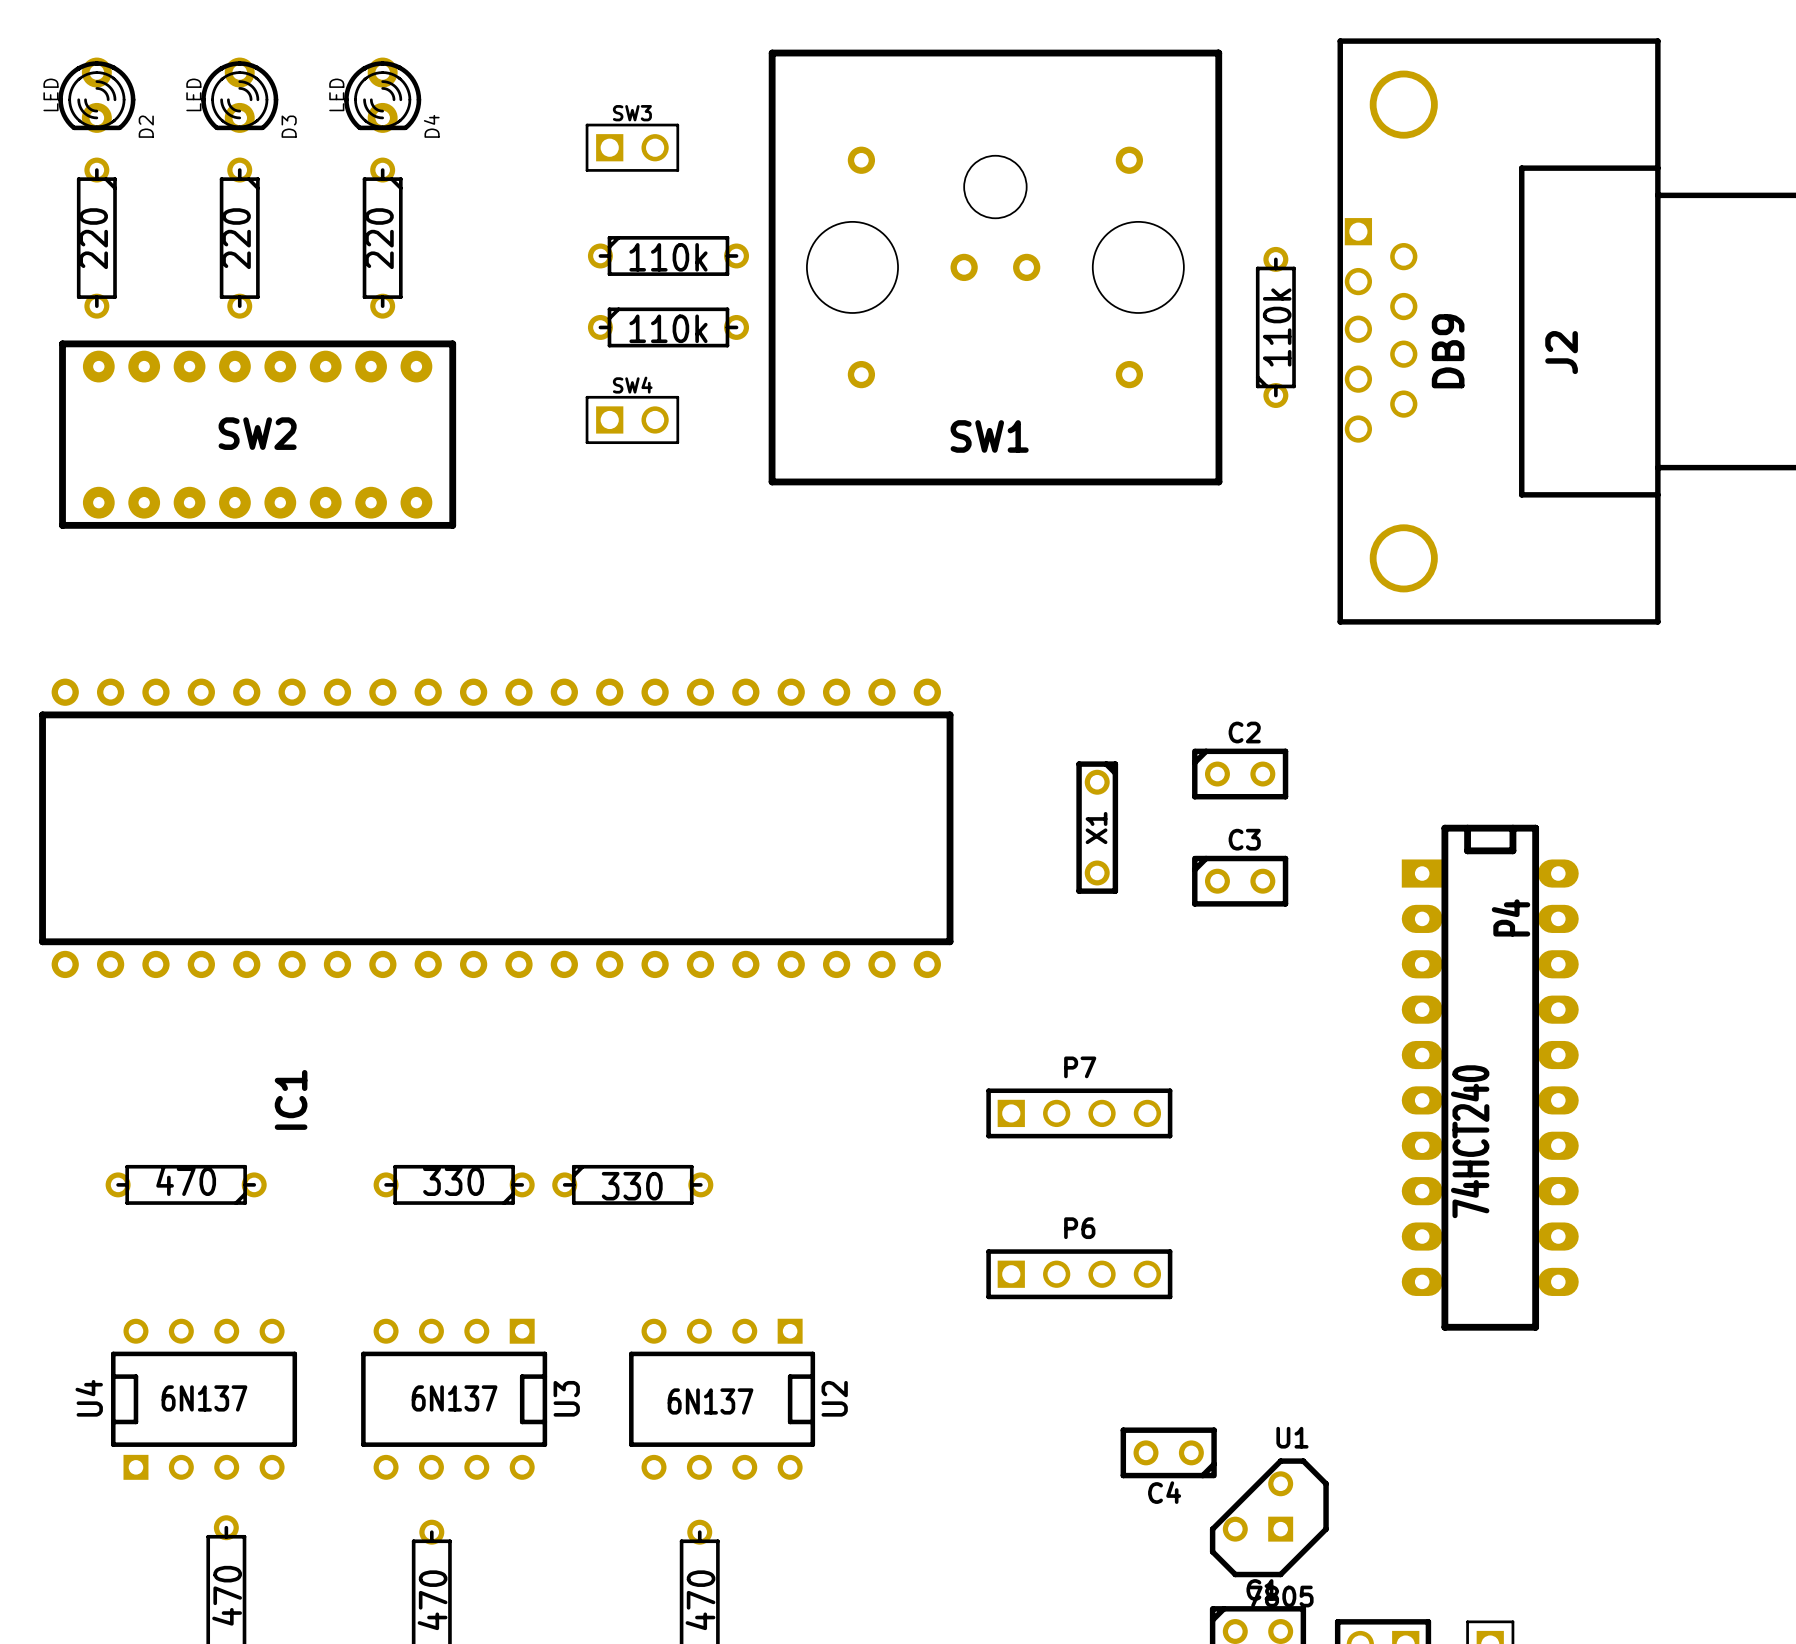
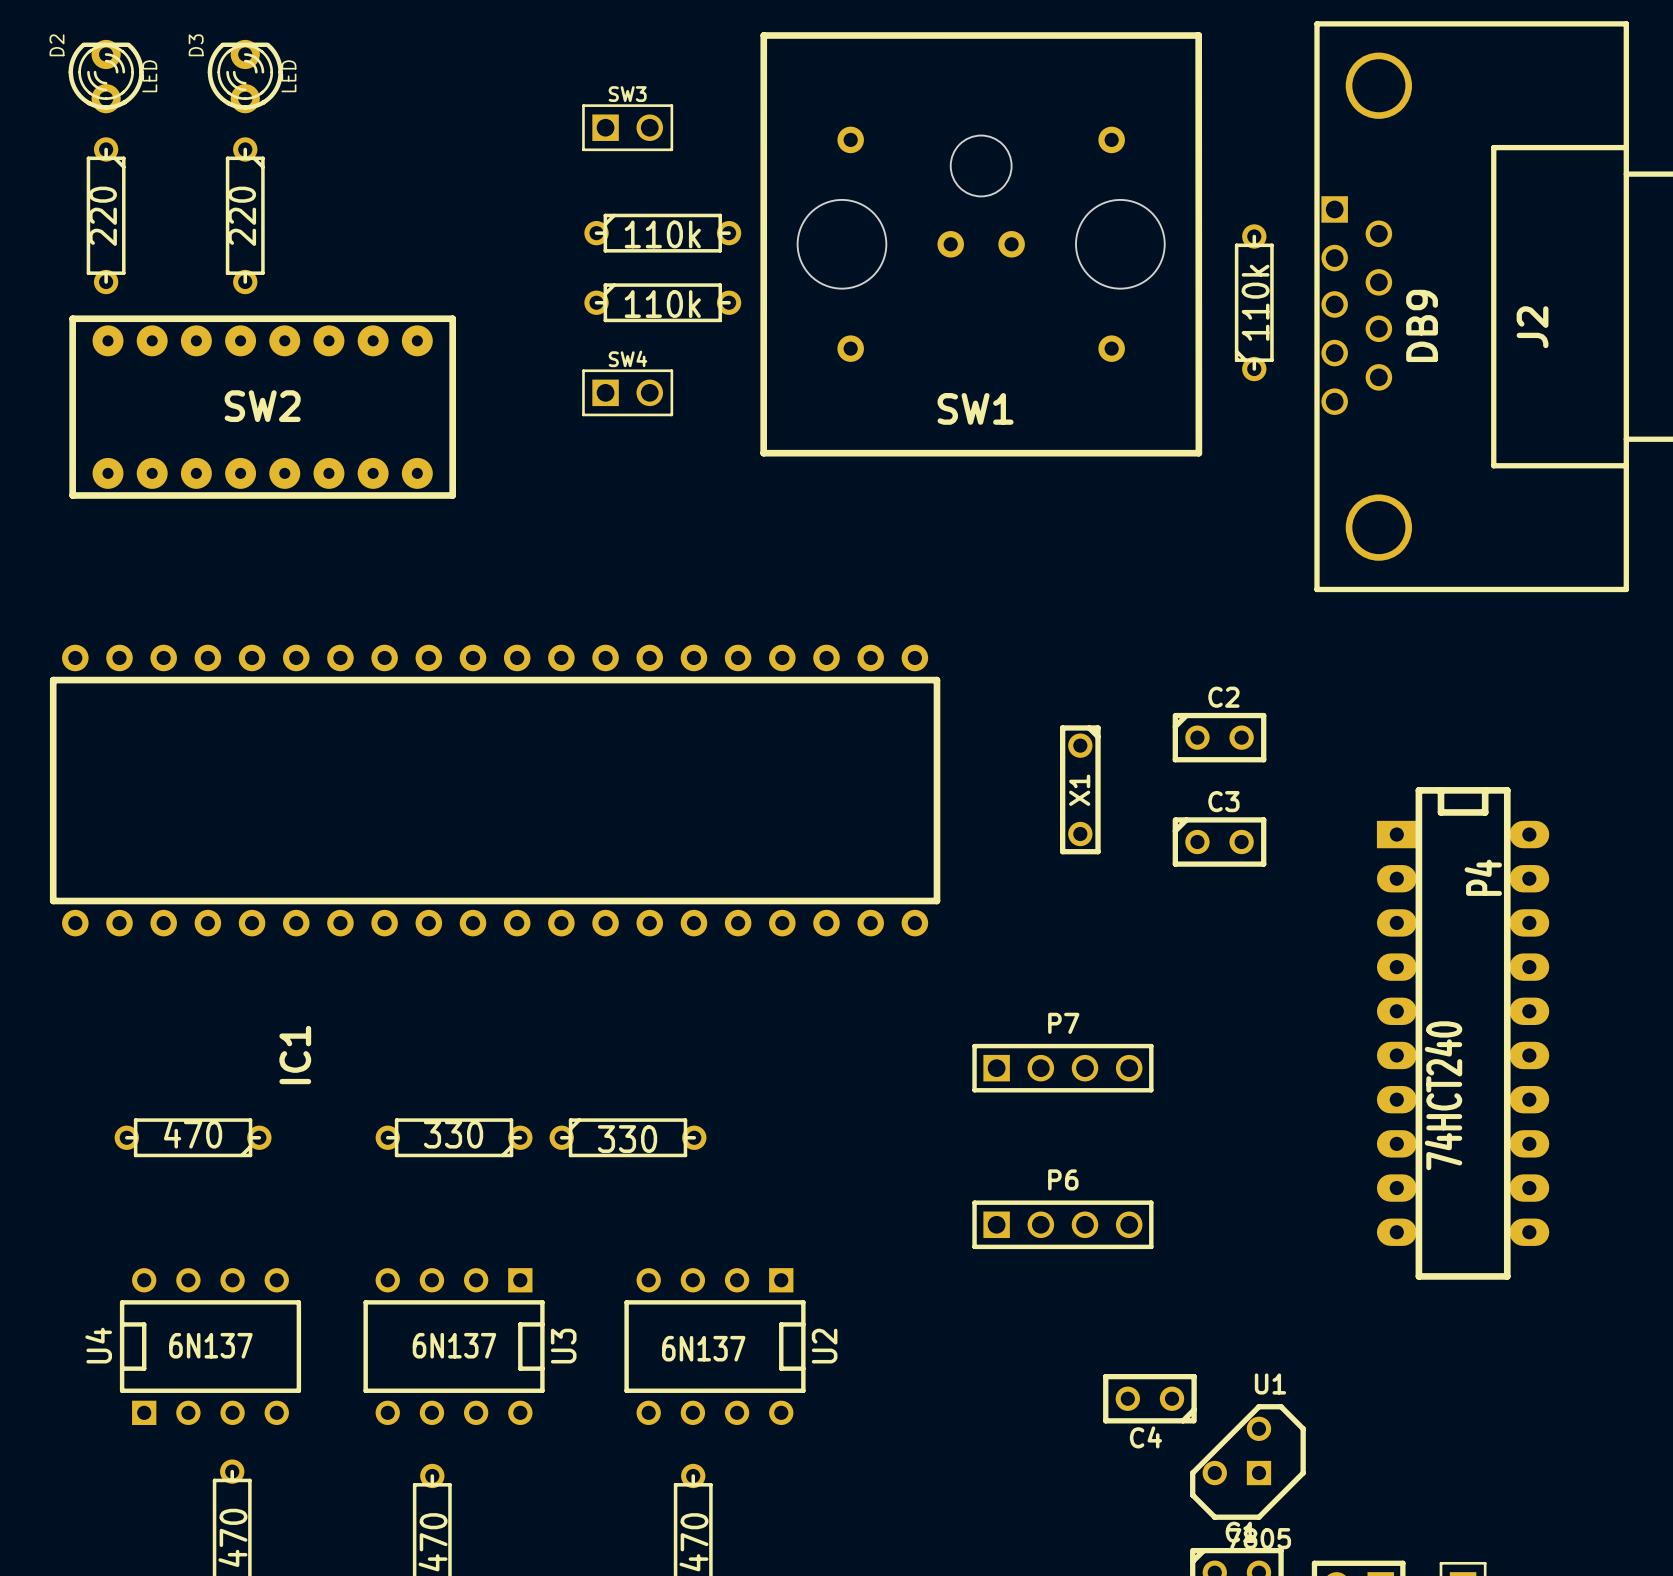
D2 rotation: 0° (96, 95) -> 180° (106, 76)
D3 rotation: 0° (239, 95) -> 180° (245, 76)
D4: LED (382, 95) -> none
part: 220 (382, 238) -> none

